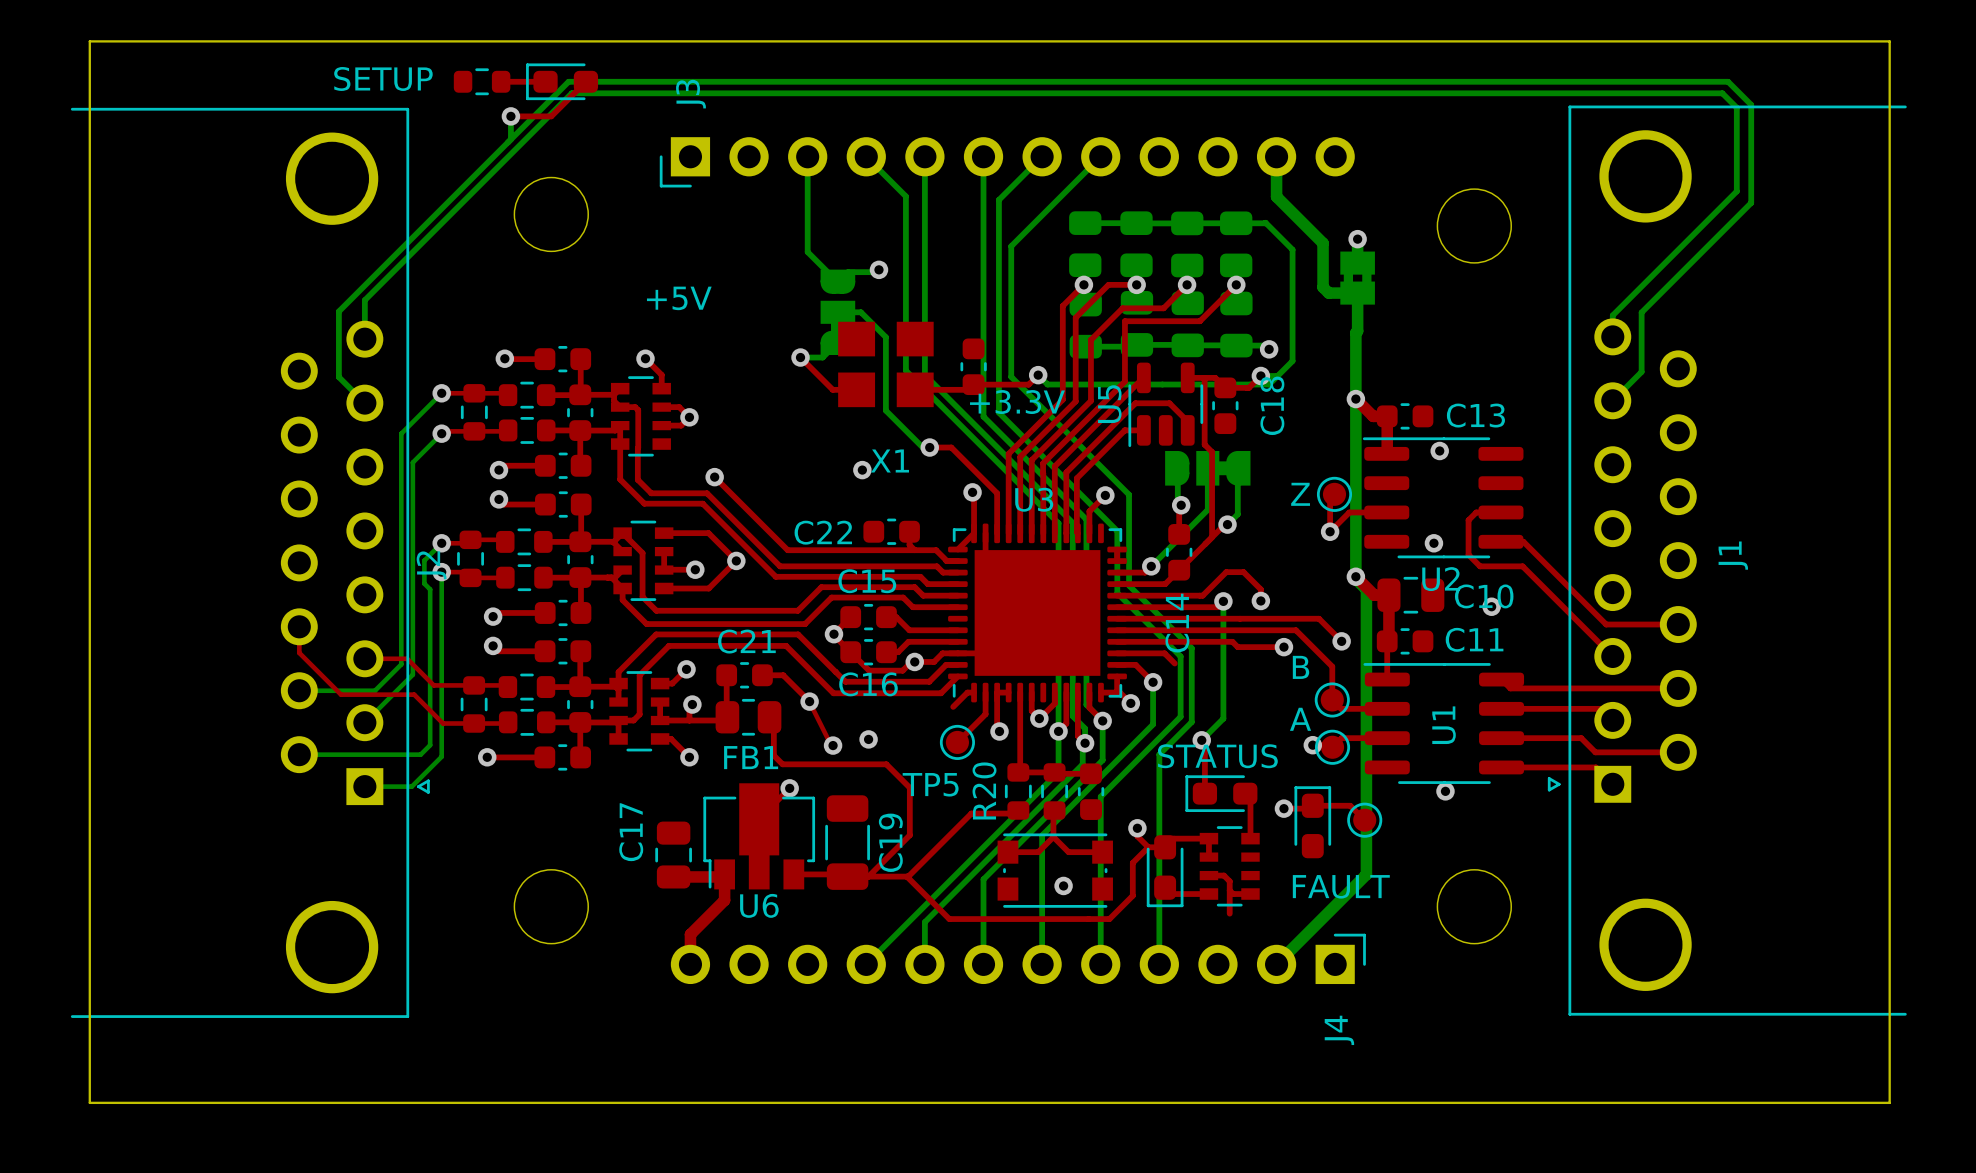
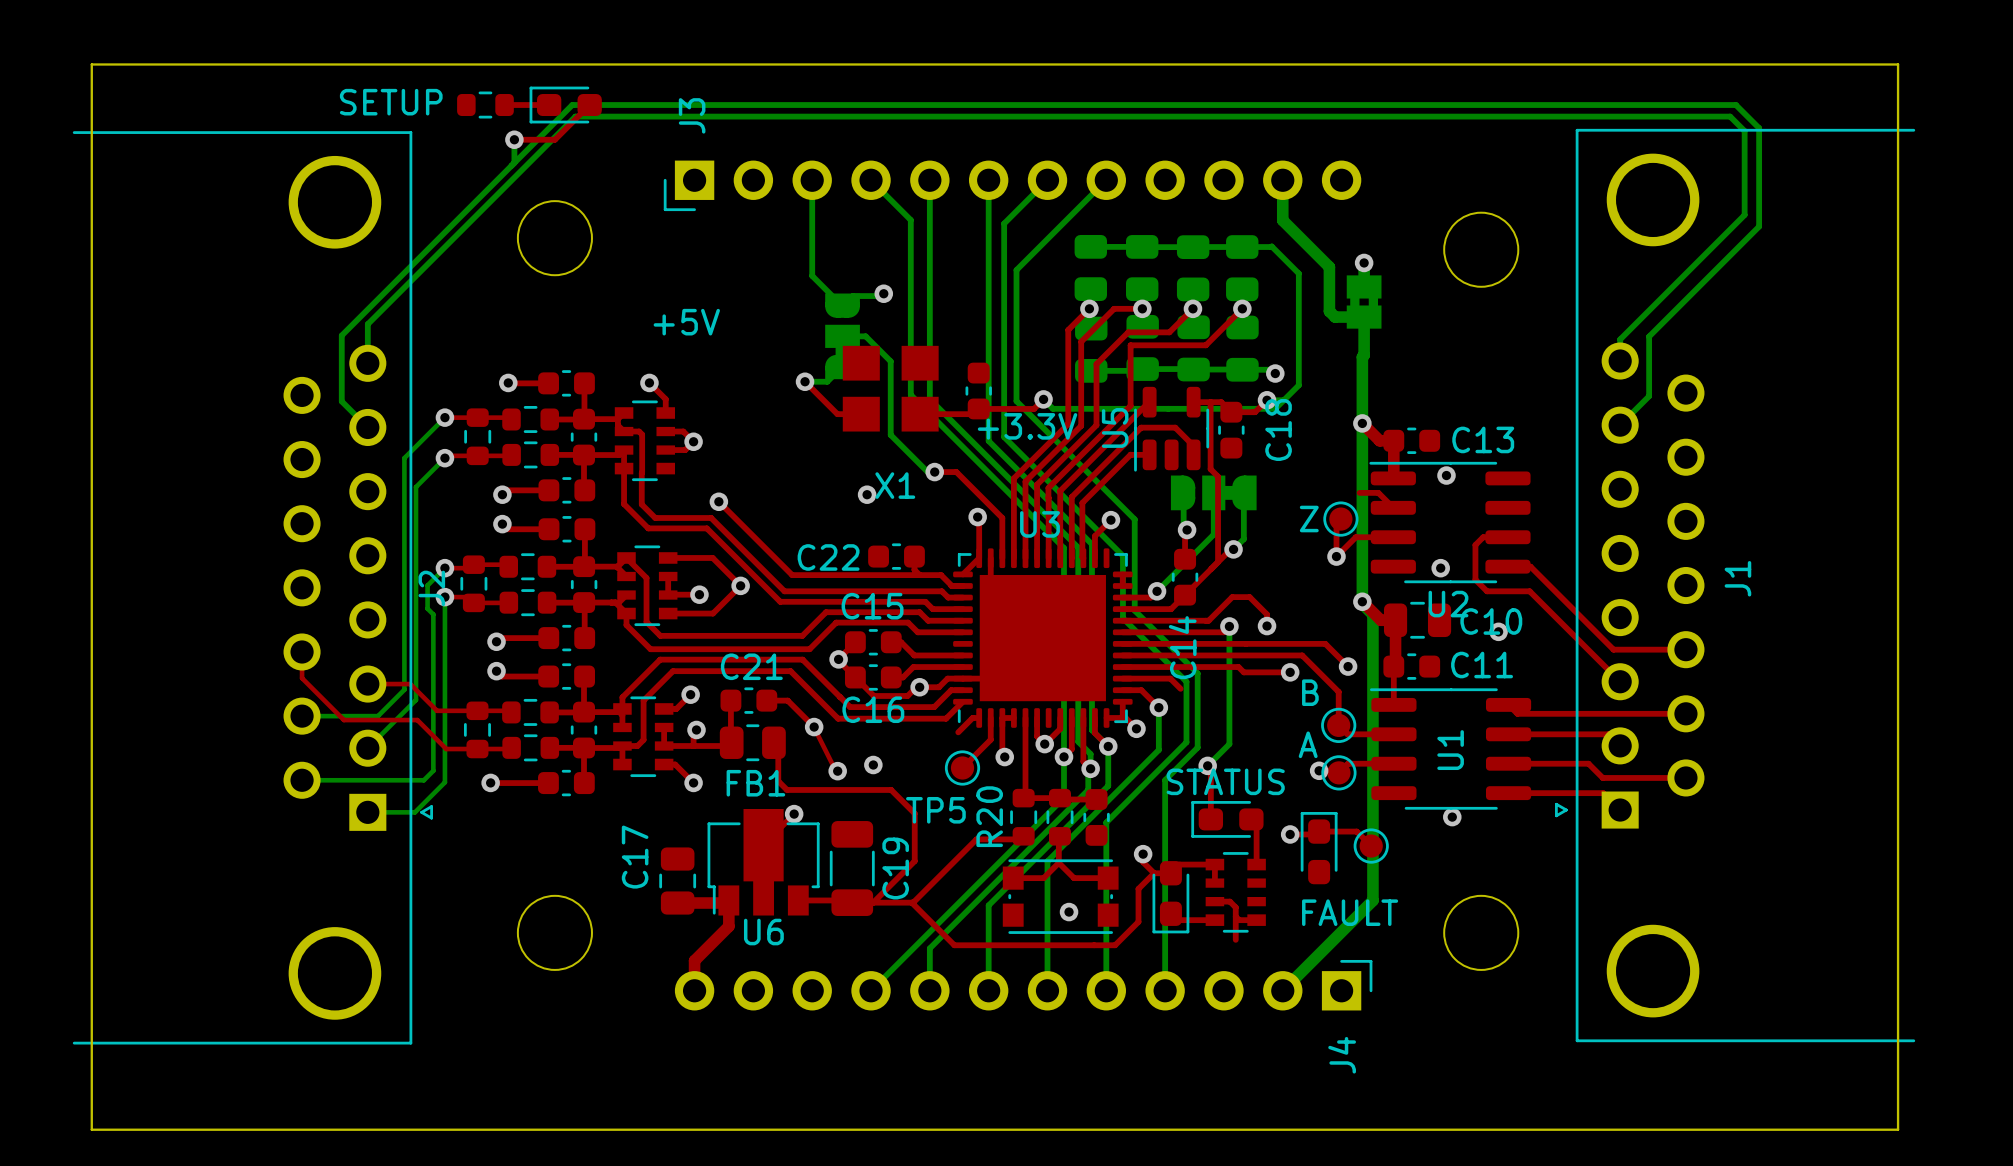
top track: none -> (1359, 492) (1378, 492) (1393, 507)

